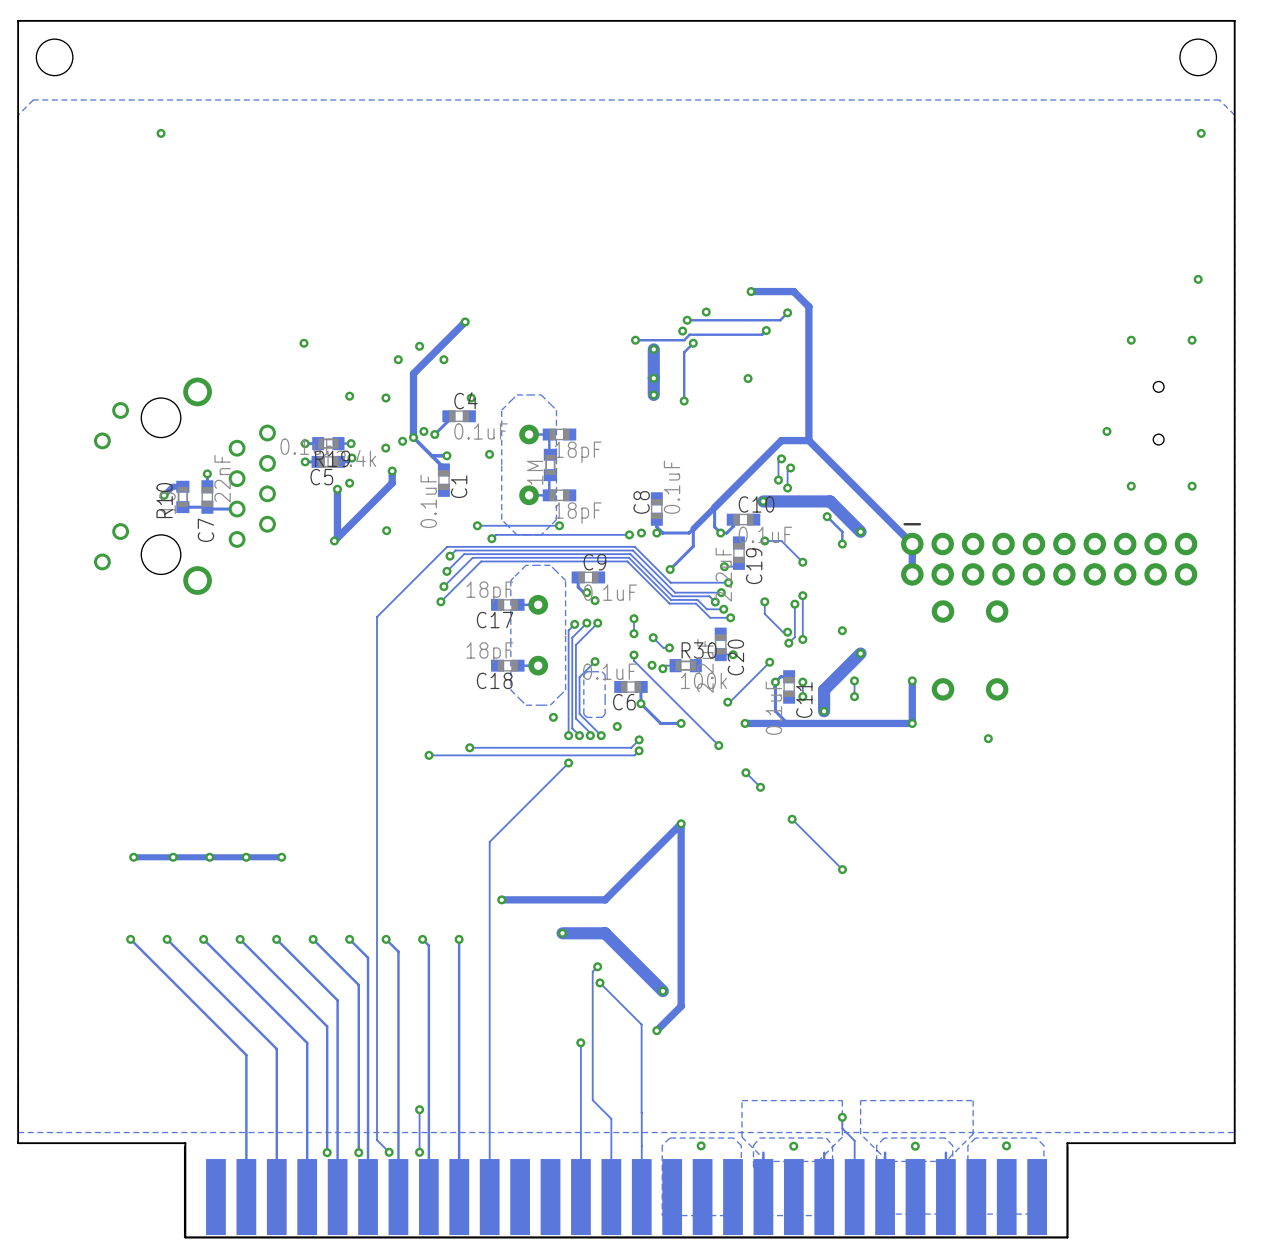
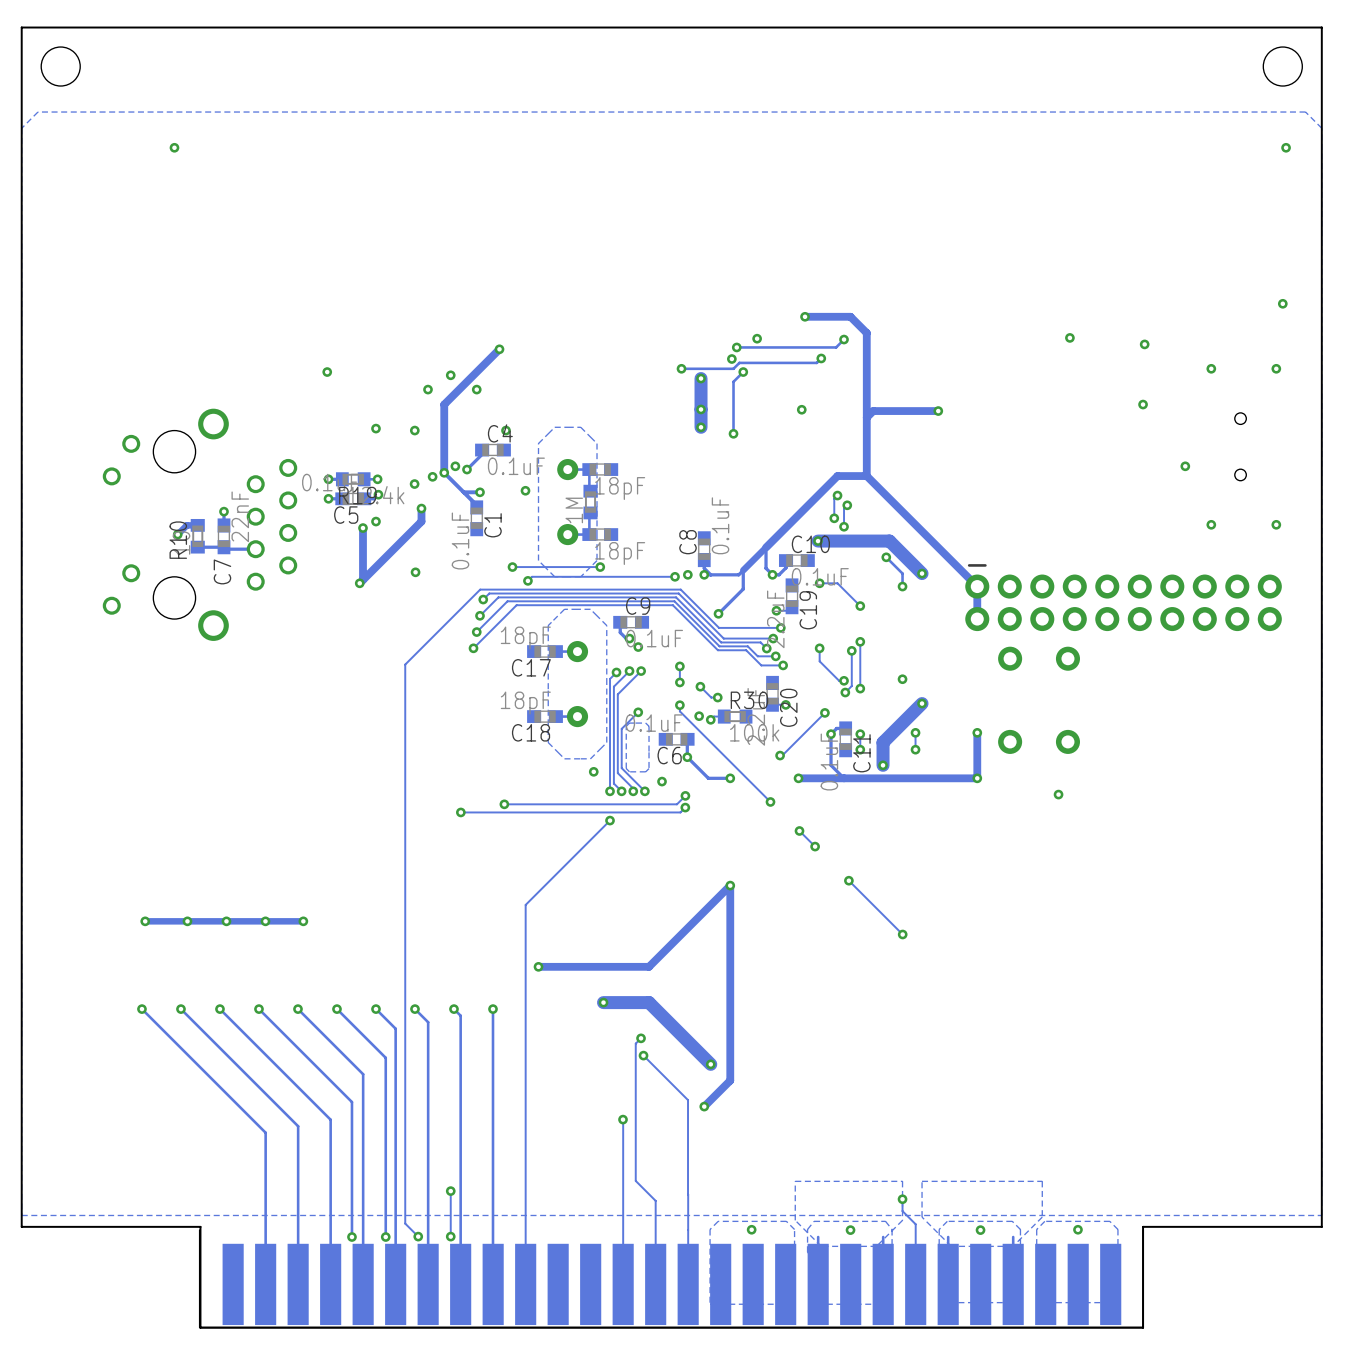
via: none -> (1069, 337)
via: none -> (1144, 344)
via: none -> (1143, 404)
track: none -> (938, 411) (873, 411) (866, 417)
via: none -> (938, 411)

